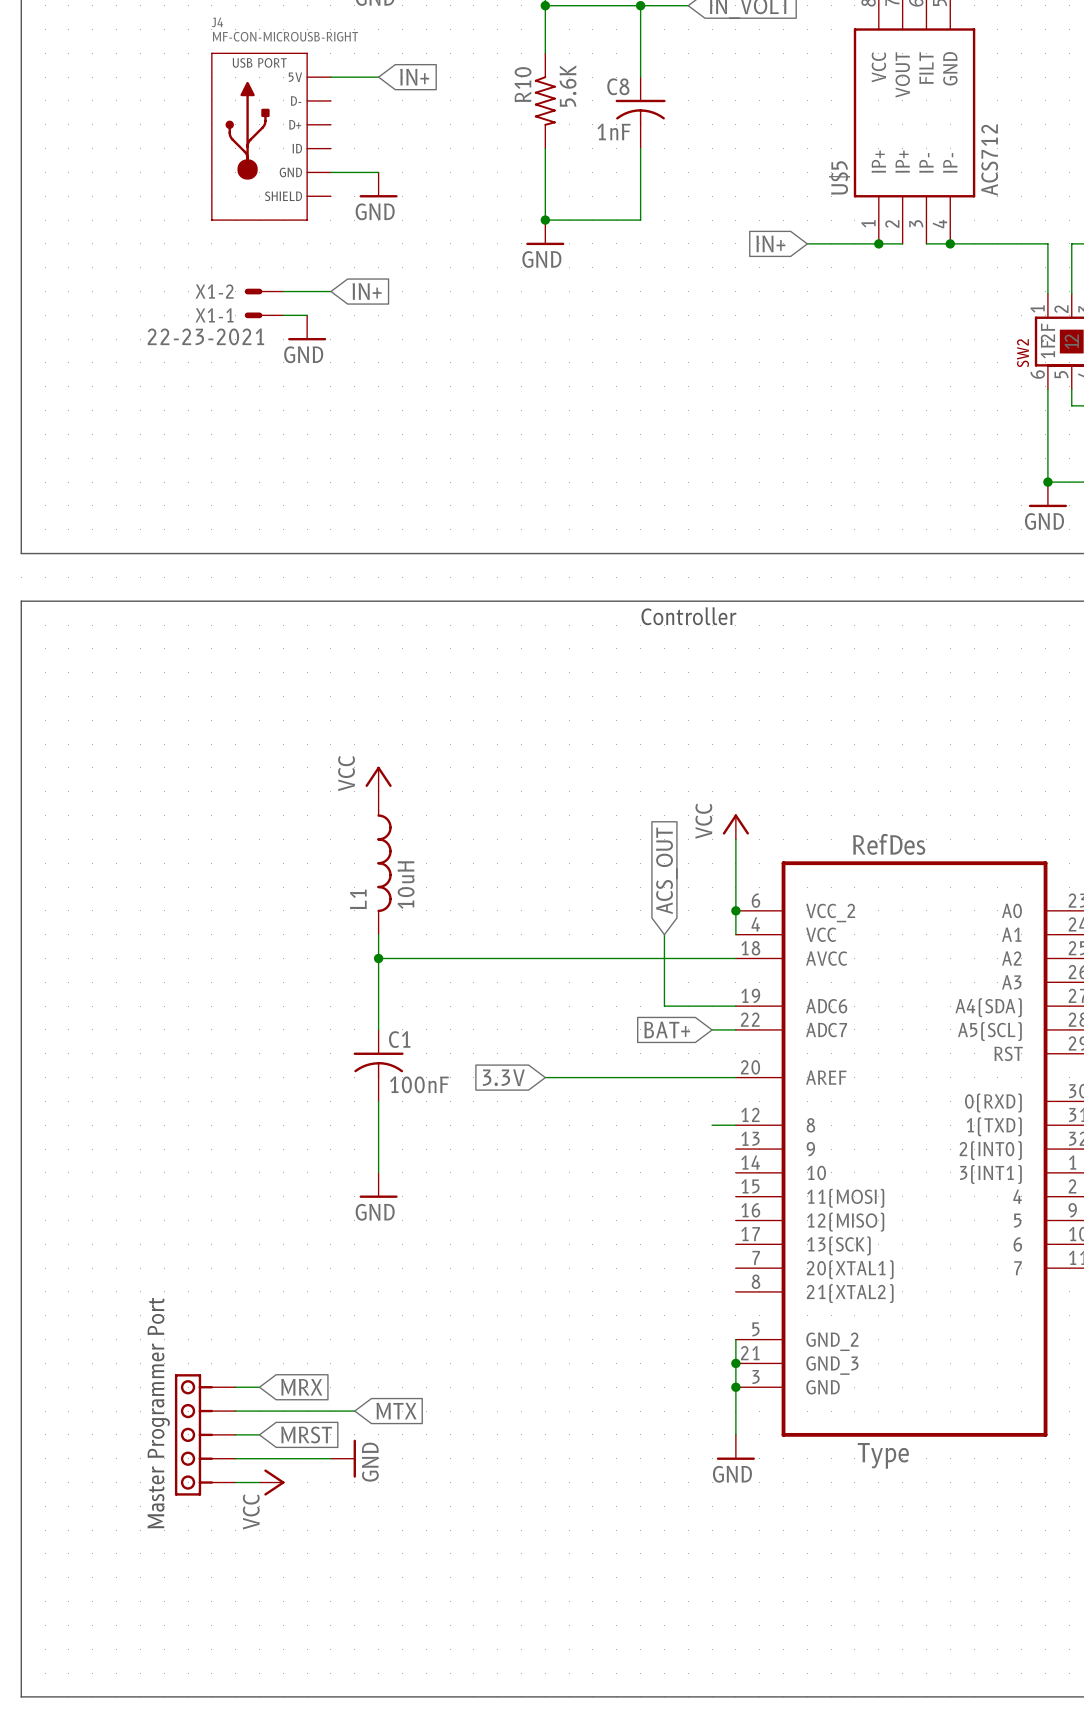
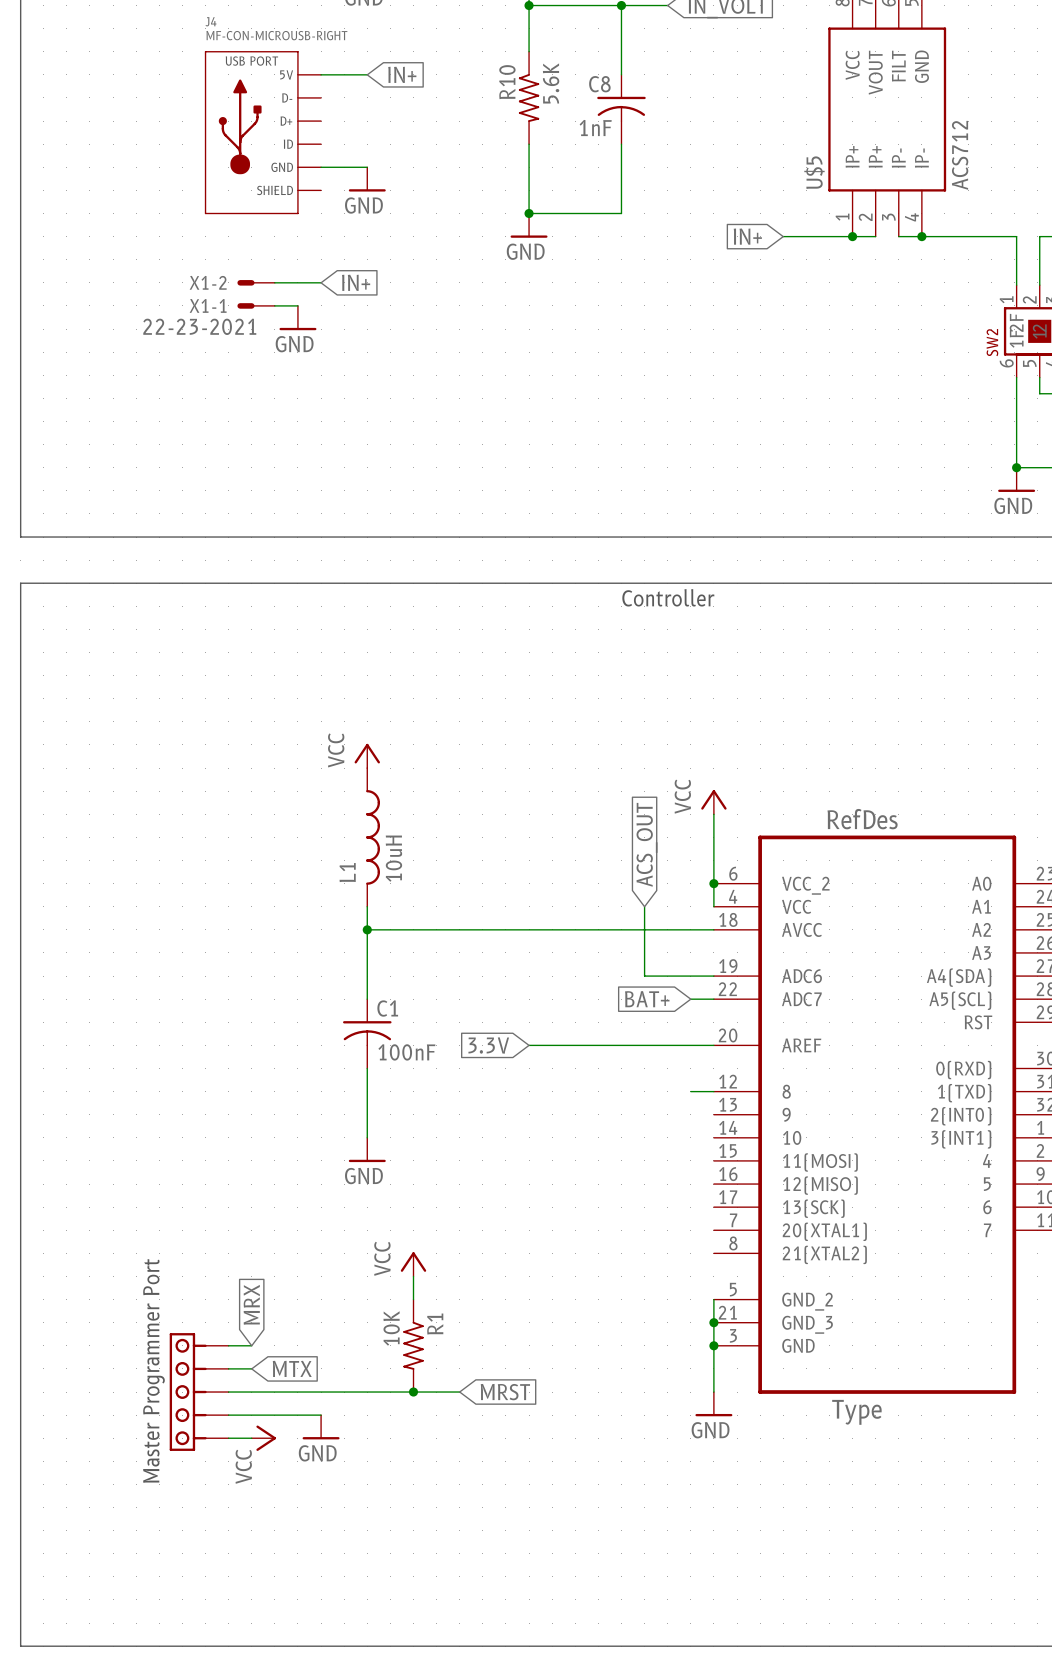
power symbol: none -> VCC (413, 1264)
wire: none -> (413, 1276) (413, 1299)
global label rotation: 0° (301, 1387) -> 90° counterclockwise (251, 1304)
R1: none -> 10K (413, 1345)
wire: (259, 1411) (354, 1411) -> none
global label position: MTX (396, 1411) -> MTX (292, 1368)
wire: none -> (251, 1392) (459, 1392)
global label position: MRST (306, 1434) -> MRST (505, 1392)
junction: none -> (413, 1392)
power symbol rotation: 0° (354, 1458) -> 90° clockwise (321, 1438)

